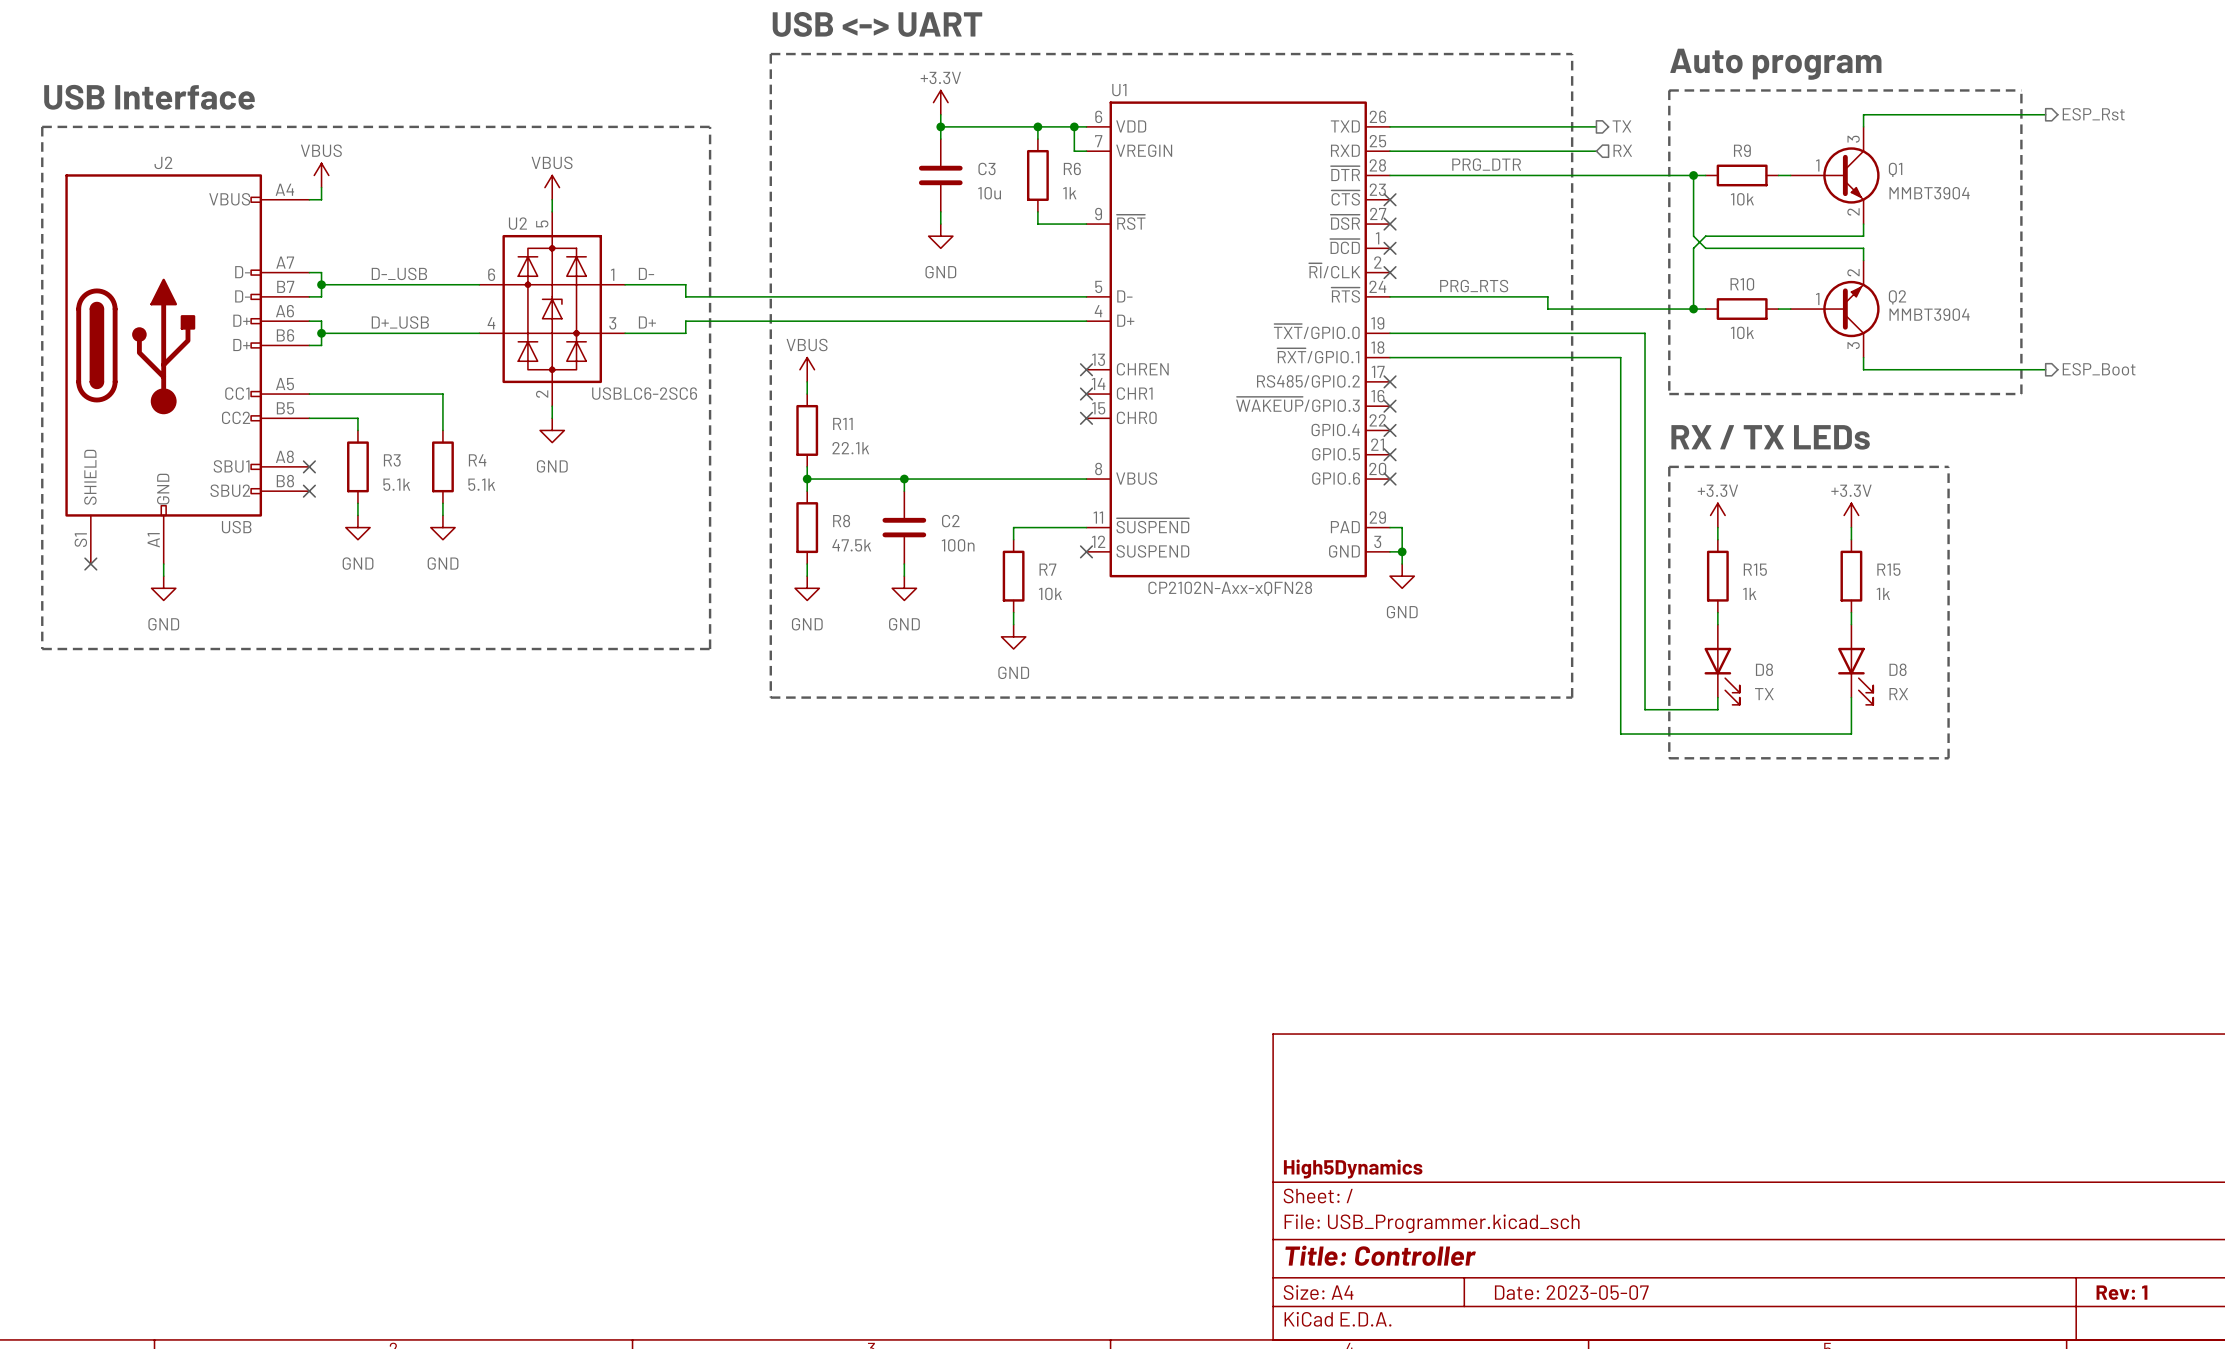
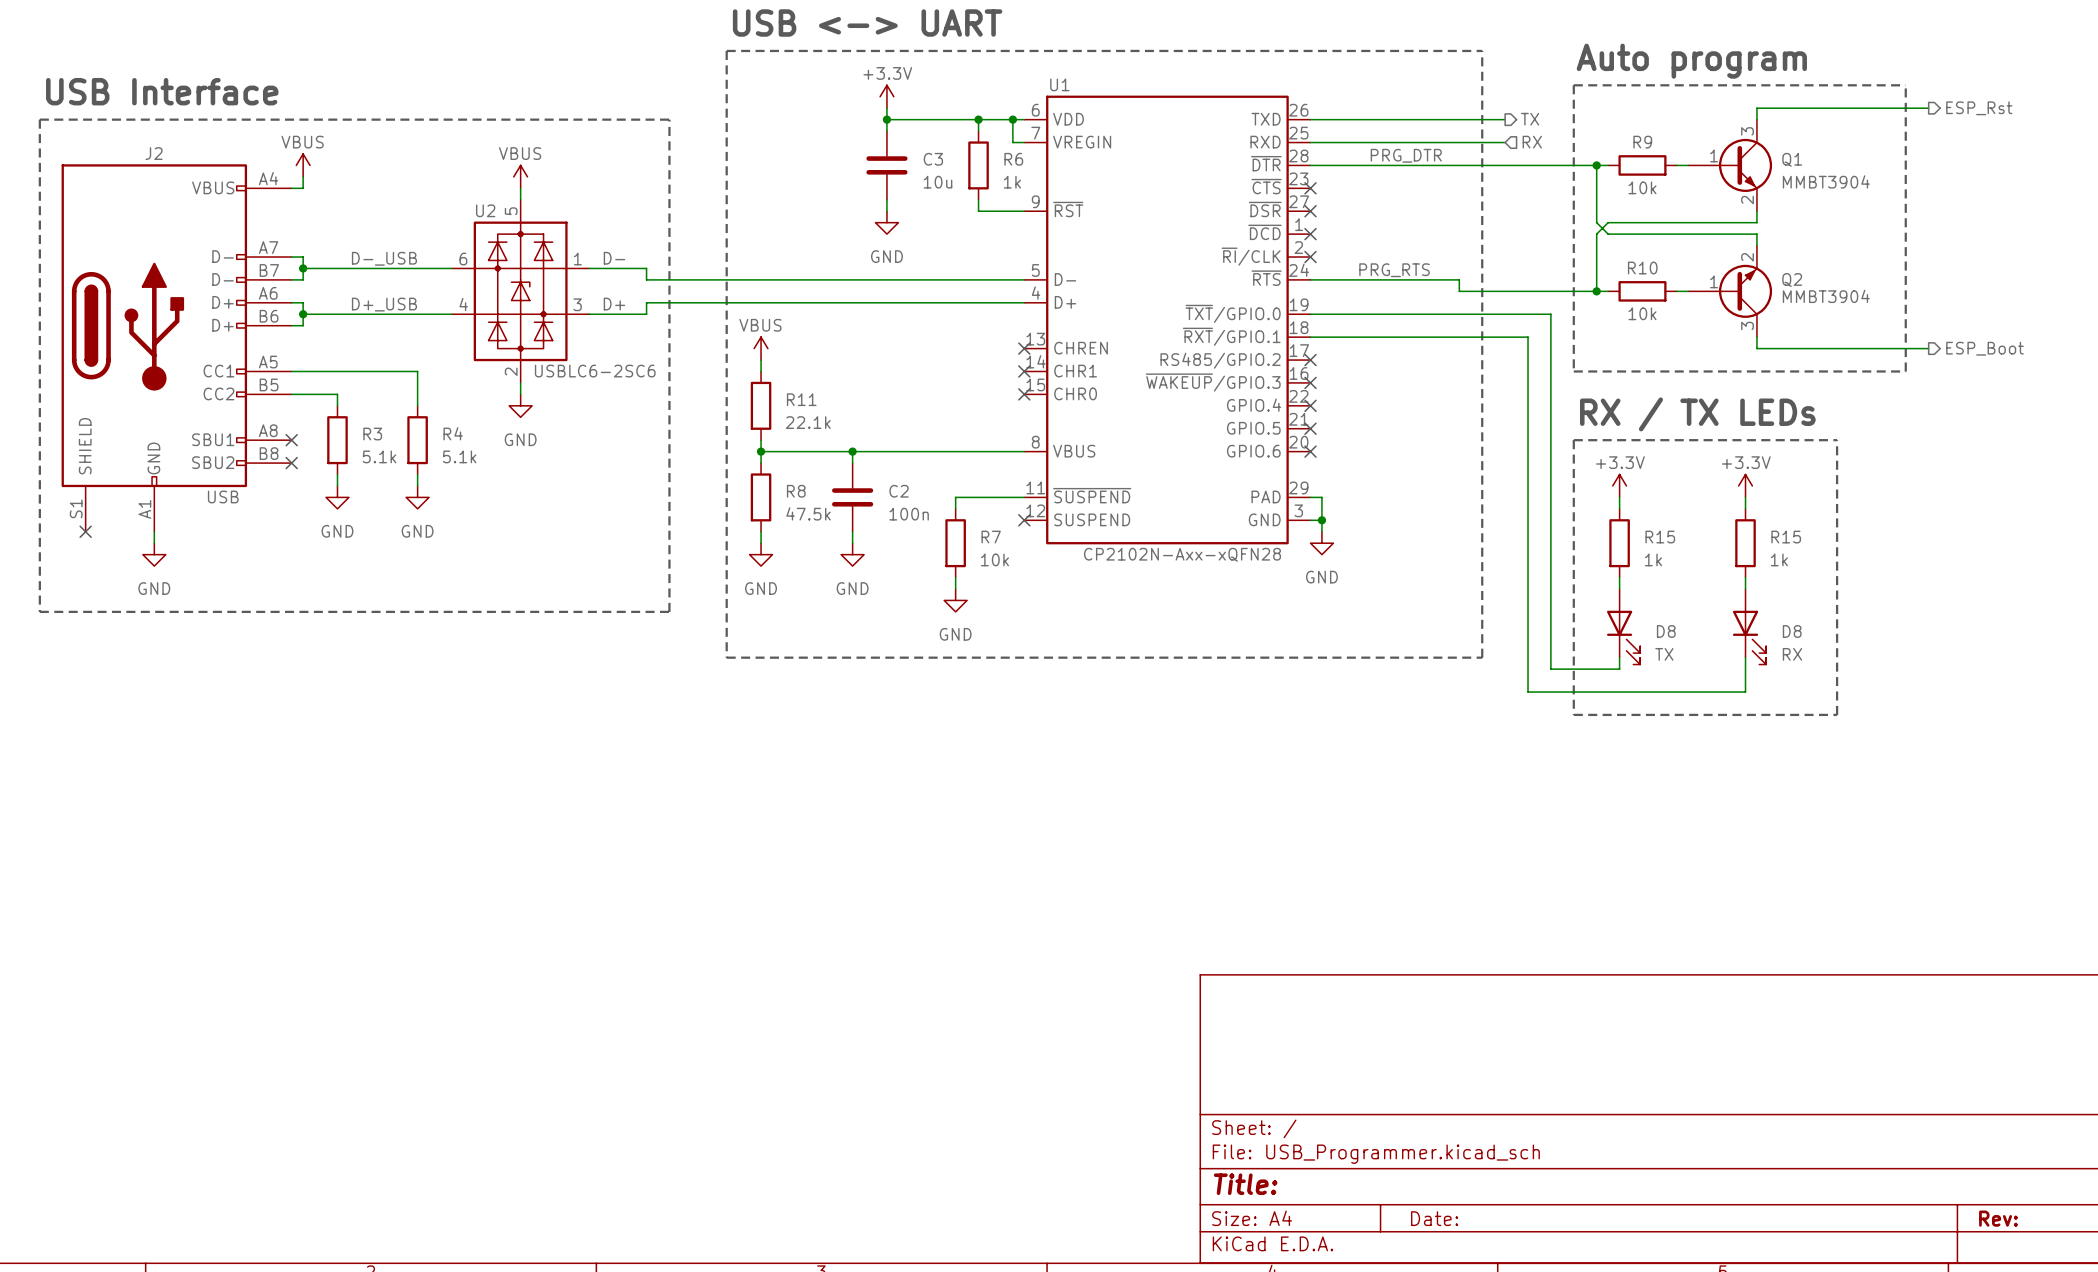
title block: High5Dynamics (1353, 1169) -> none
title block: Title: Controller (1380, 1255) -> Title: (1245, 1184)
title block: Date: 2023-05-07 (1571, 1292) -> Date: (1434, 1218)
title block: Rev: 1 (2121, 1292) -> Rev: (1998, 1218)

